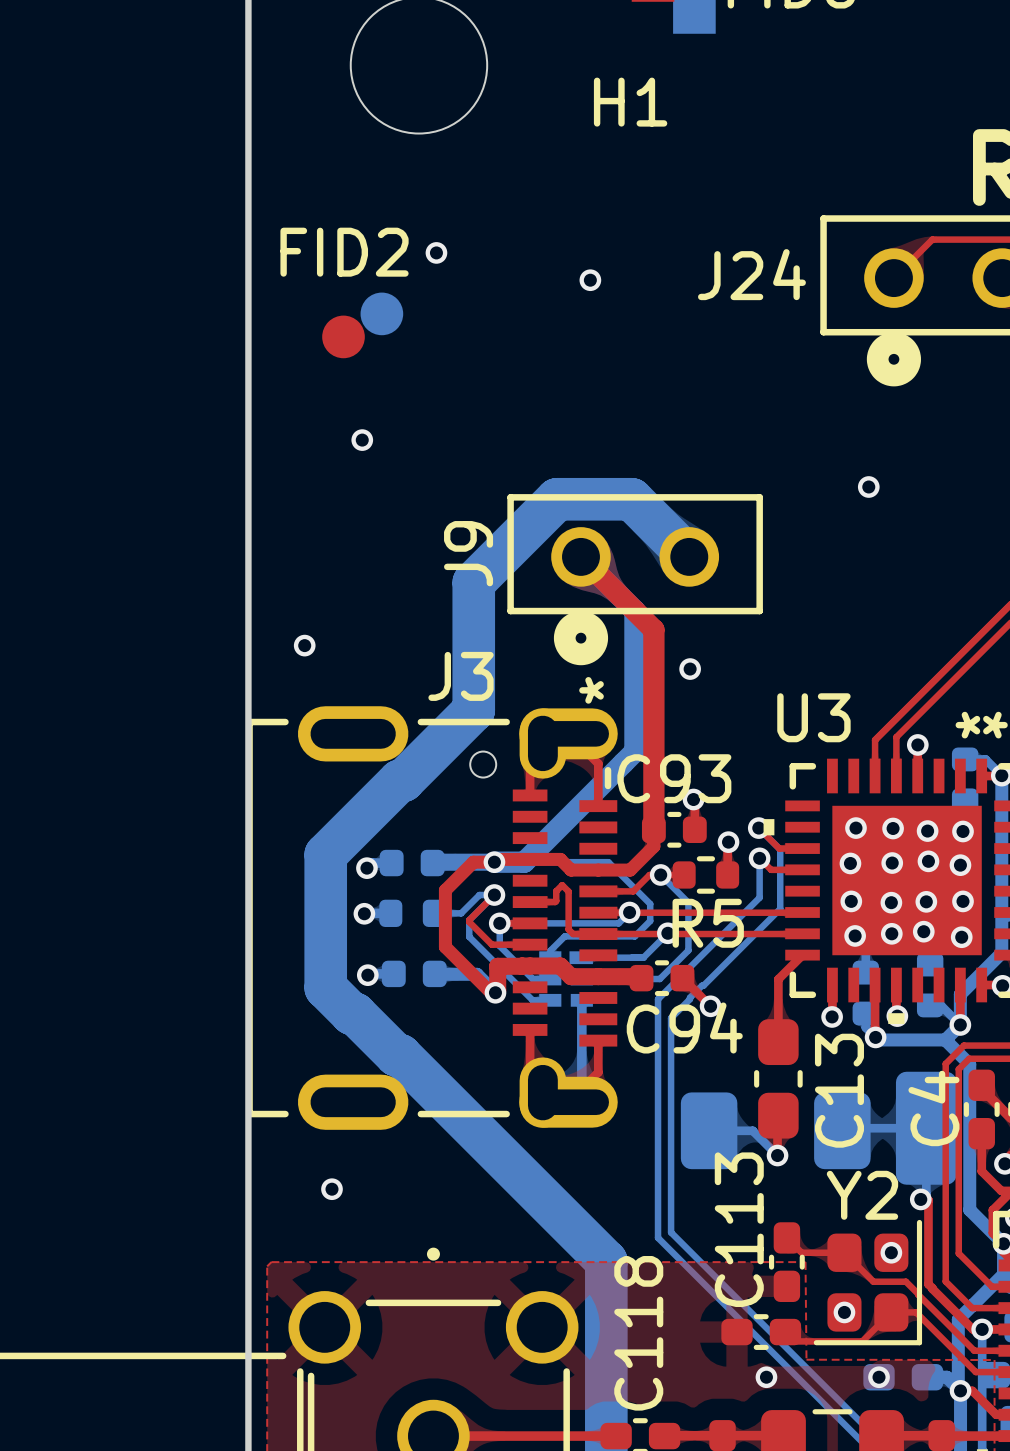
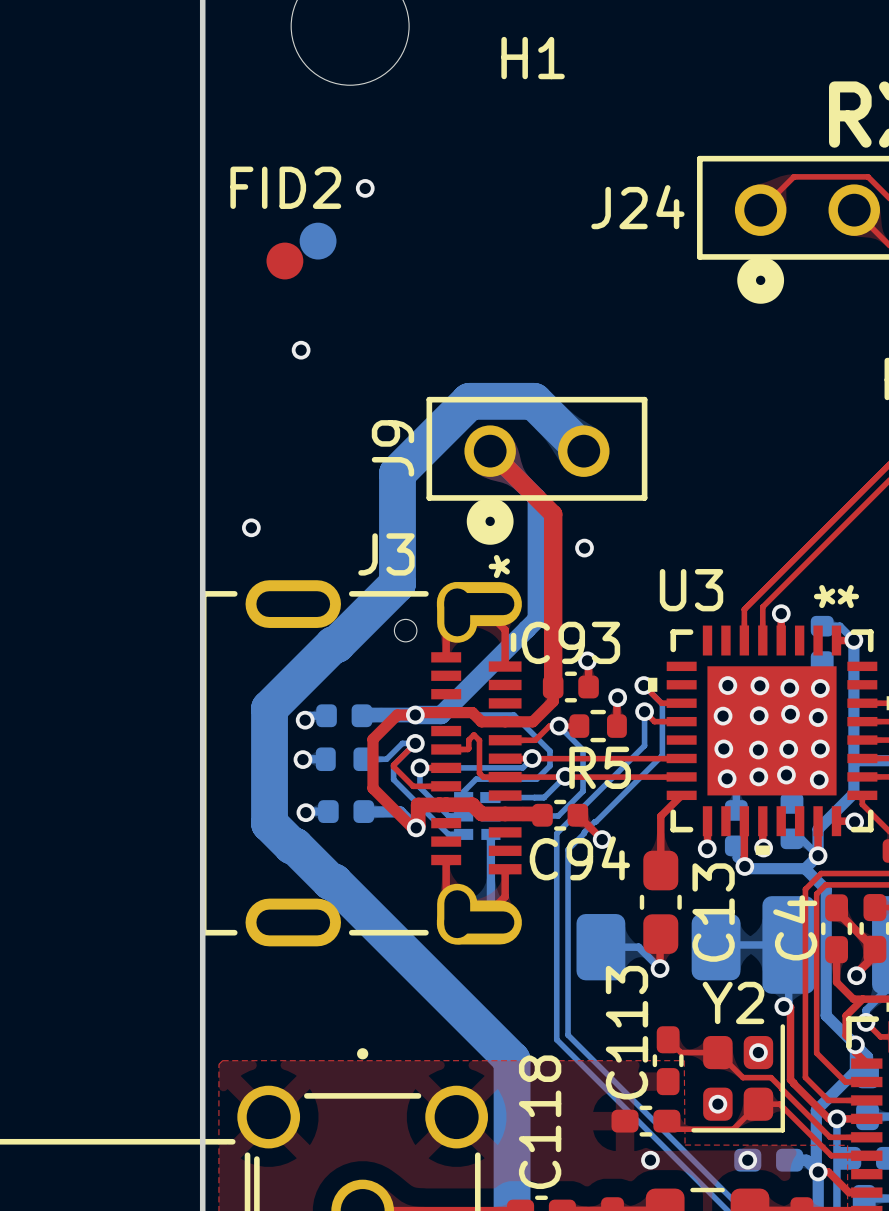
via: (590, 280) -> none
via: (868, 486) -> none
via: (331, 1189) -> none

